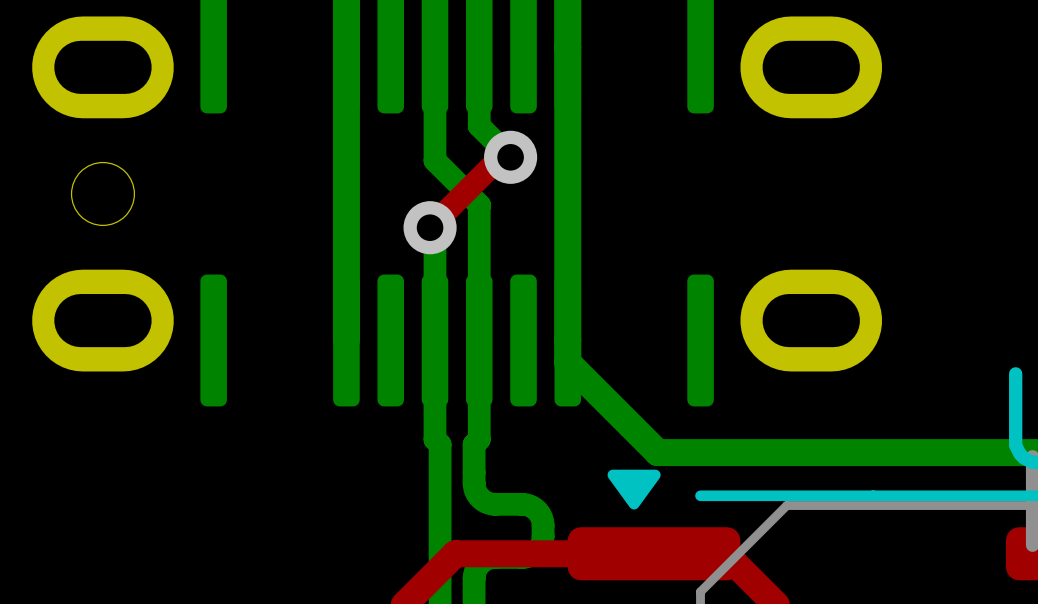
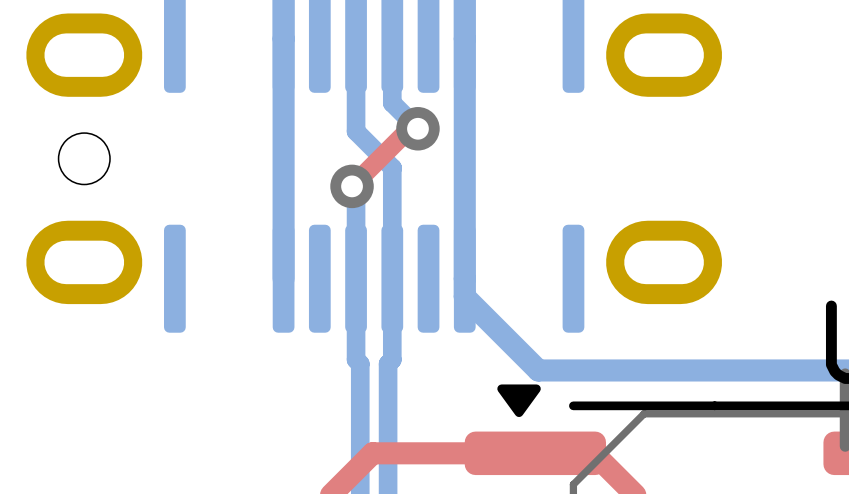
bottom track: (474, 483) (477, 494) (486, 502) (492, 504) (524, 504) (533, 507) (540, 516) (543, 525) (541, 543) (535, 552) (524, 557) (492, 557) (486, 559) (477, 567) (474, 578) -> (388, 395) (388, 473)

